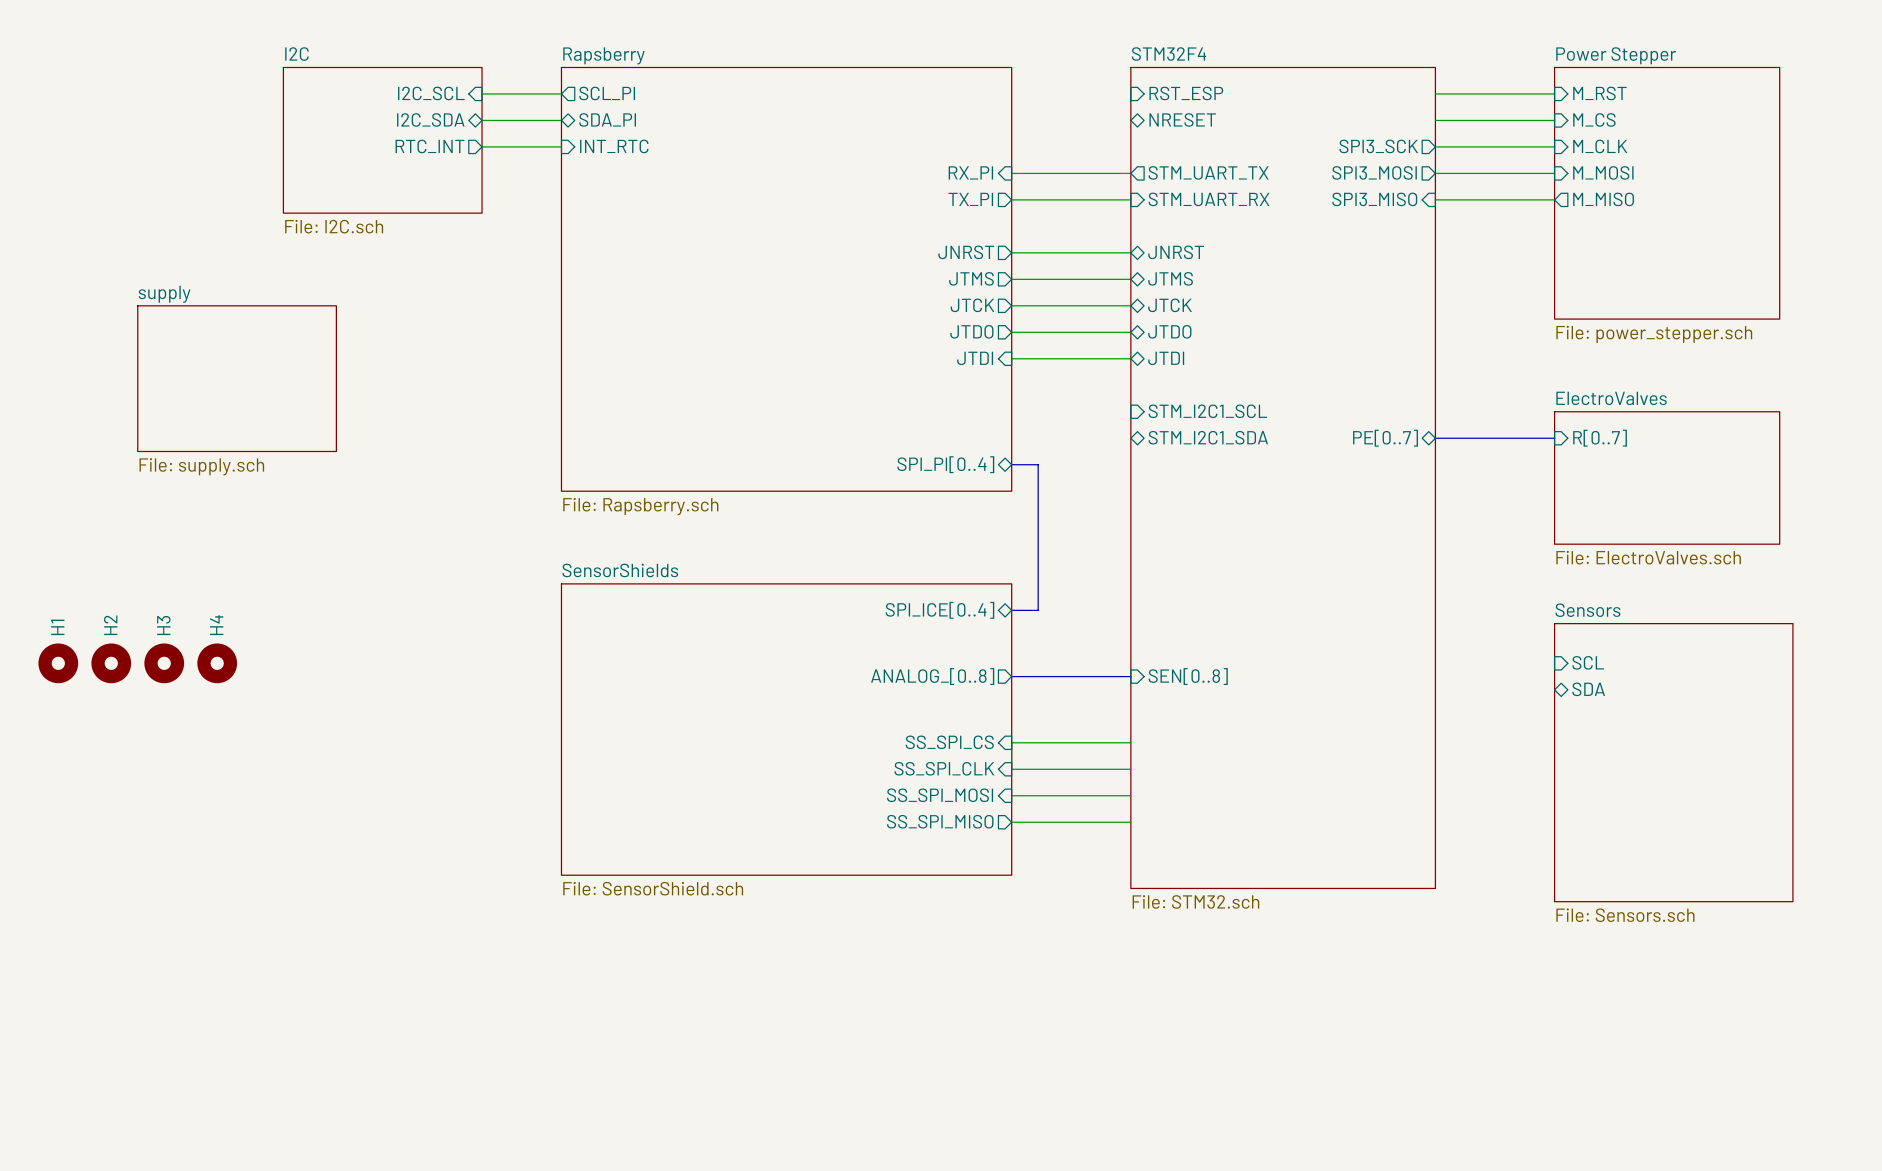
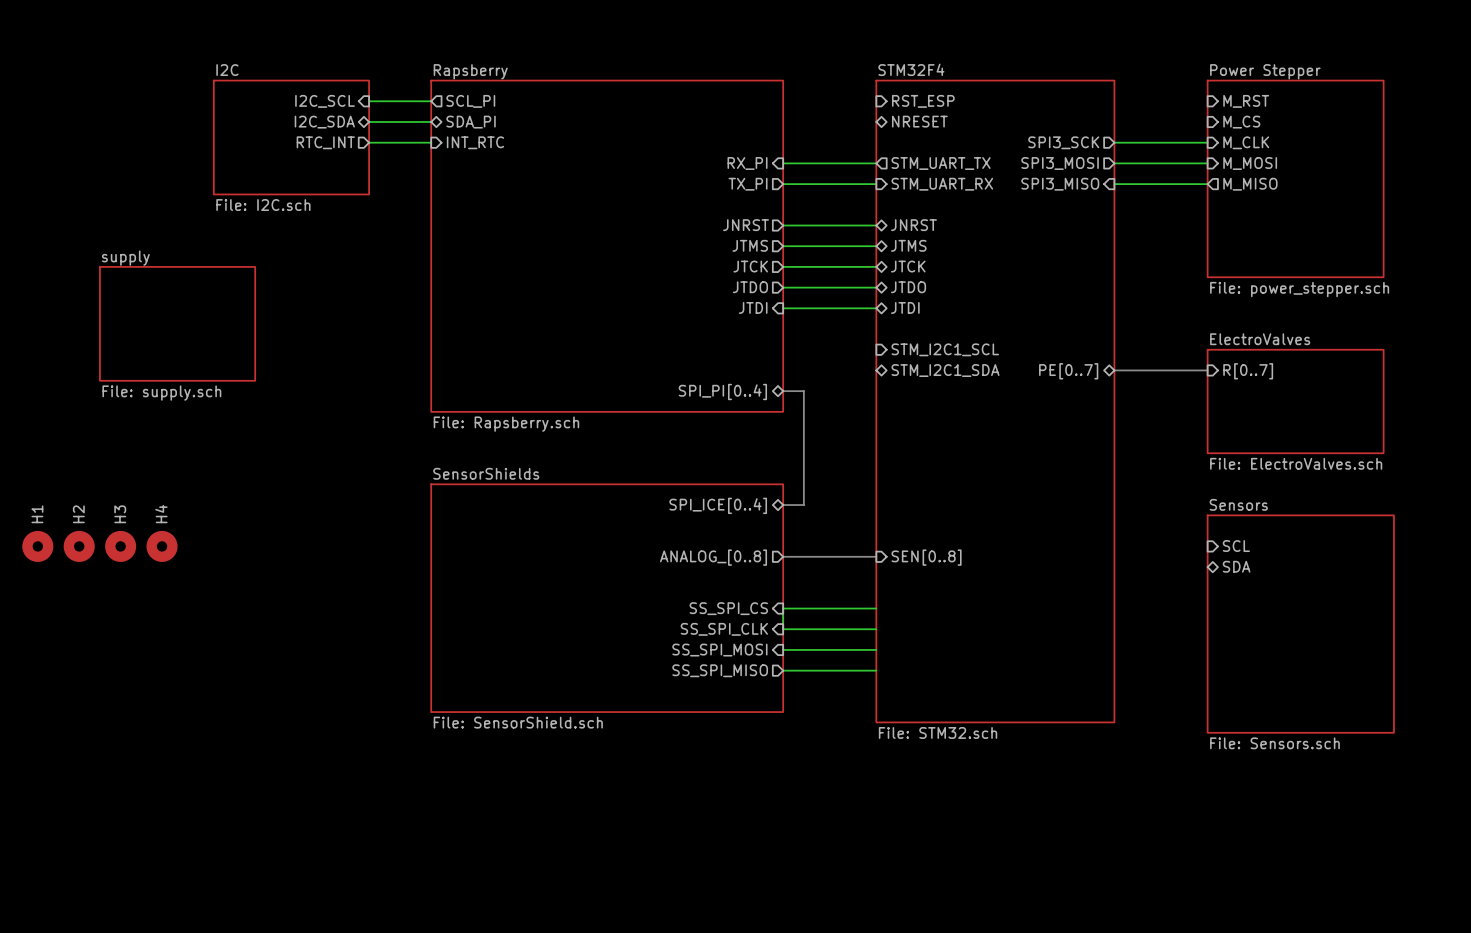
wire: (1435, 93) (1554, 93) -> none
wire: (1435, 120) (1554, 120) -> none

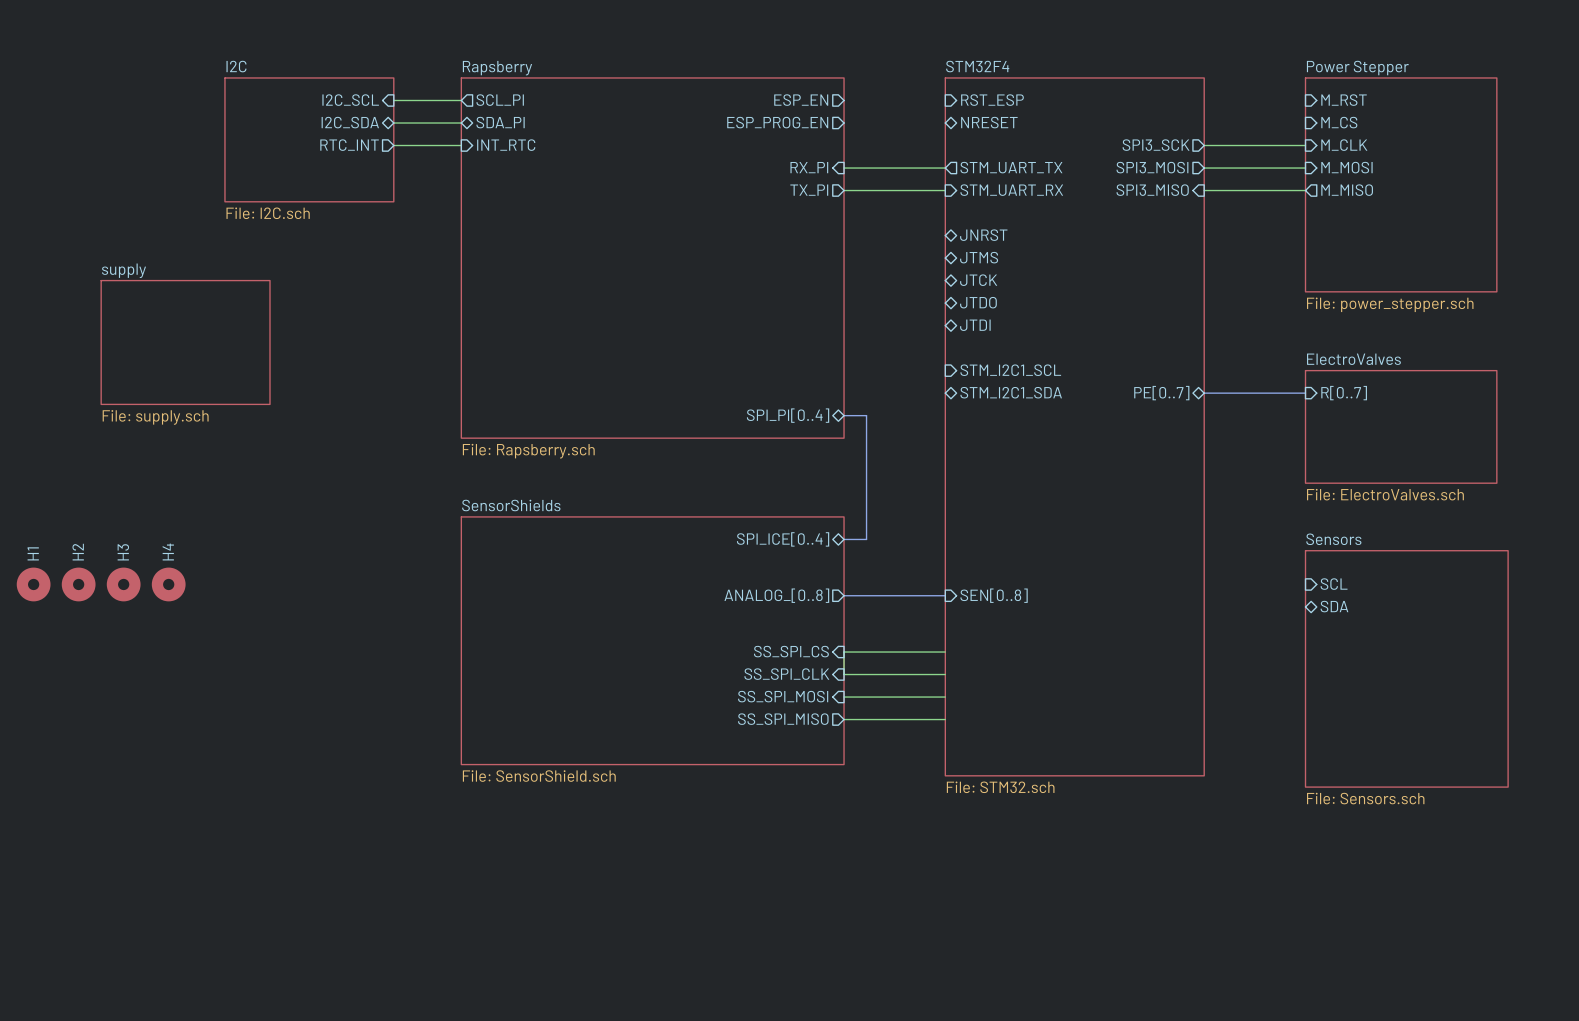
sheet pin: none -> ESP_EN (801, 100)
sheet pin: none -> ESP_PROG_EN (777, 122)
sheet pin: JNRST (746, 225) -> none
wire: (783, 225) (876, 225) -> none
sheet pin: JTMS (750, 245) -> none
wire: (783, 246) (876, 246) -> none
sheet pin: JTCK (750, 266) -> none
wire: (783, 266) (876, 266) -> none
sheet pin: JTDO (750, 287) -> none
wire: (783, 287) (876, 287) -> none
sheet pin: JTDI (753, 307) -> none
wire: (783, 308) (876, 308) -> none

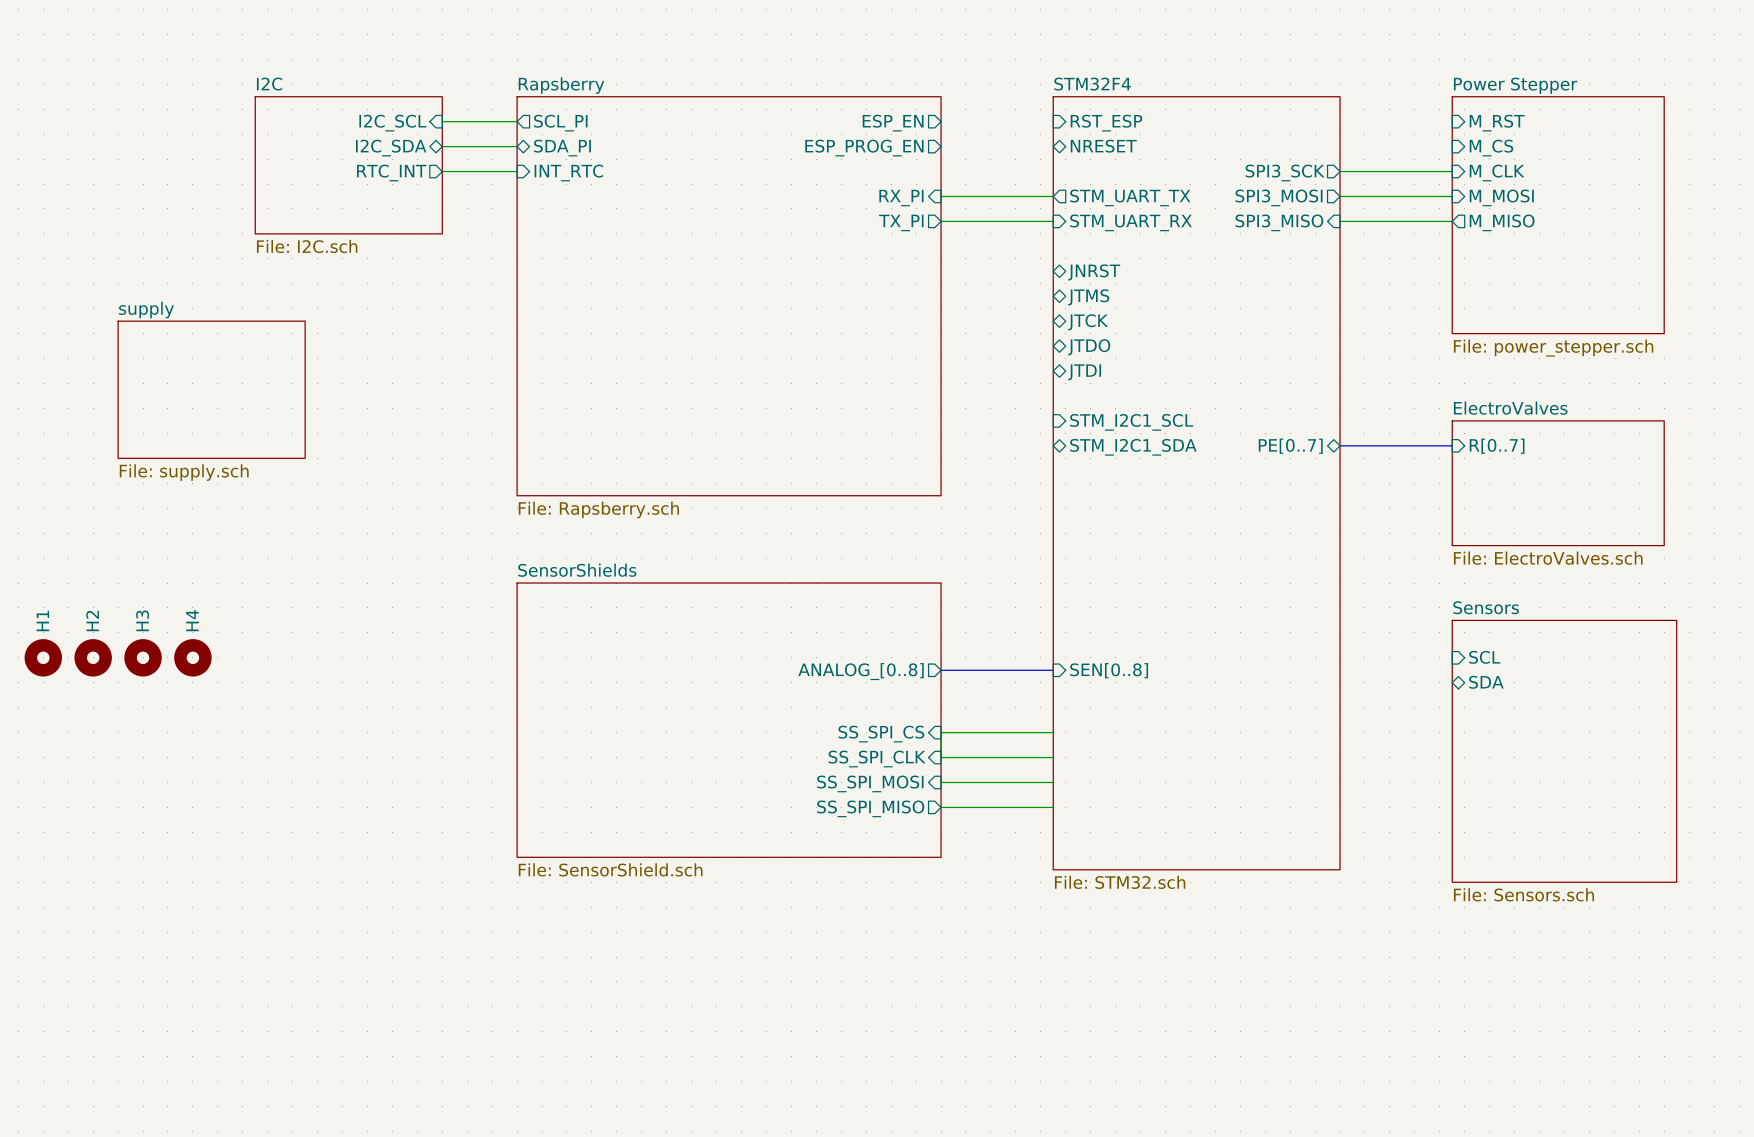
sheet pin: SPI_PI[0..4] (788, 415) -> none
bus: (844, 415) (866, 415) (866, 539) (844, 539) -> none
sheet pin: SPI_ICE[0..4] (783, 539) -> none

